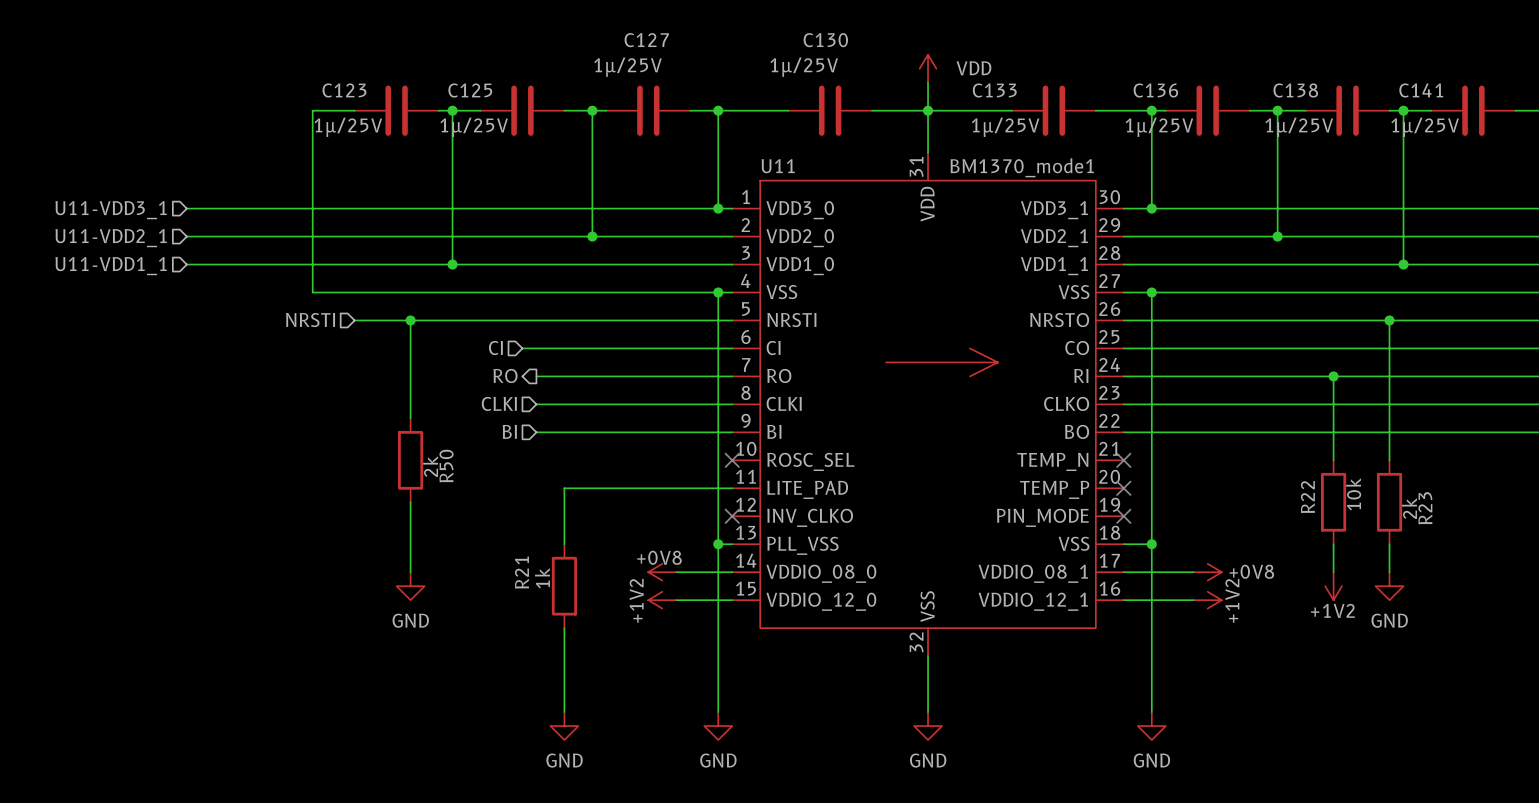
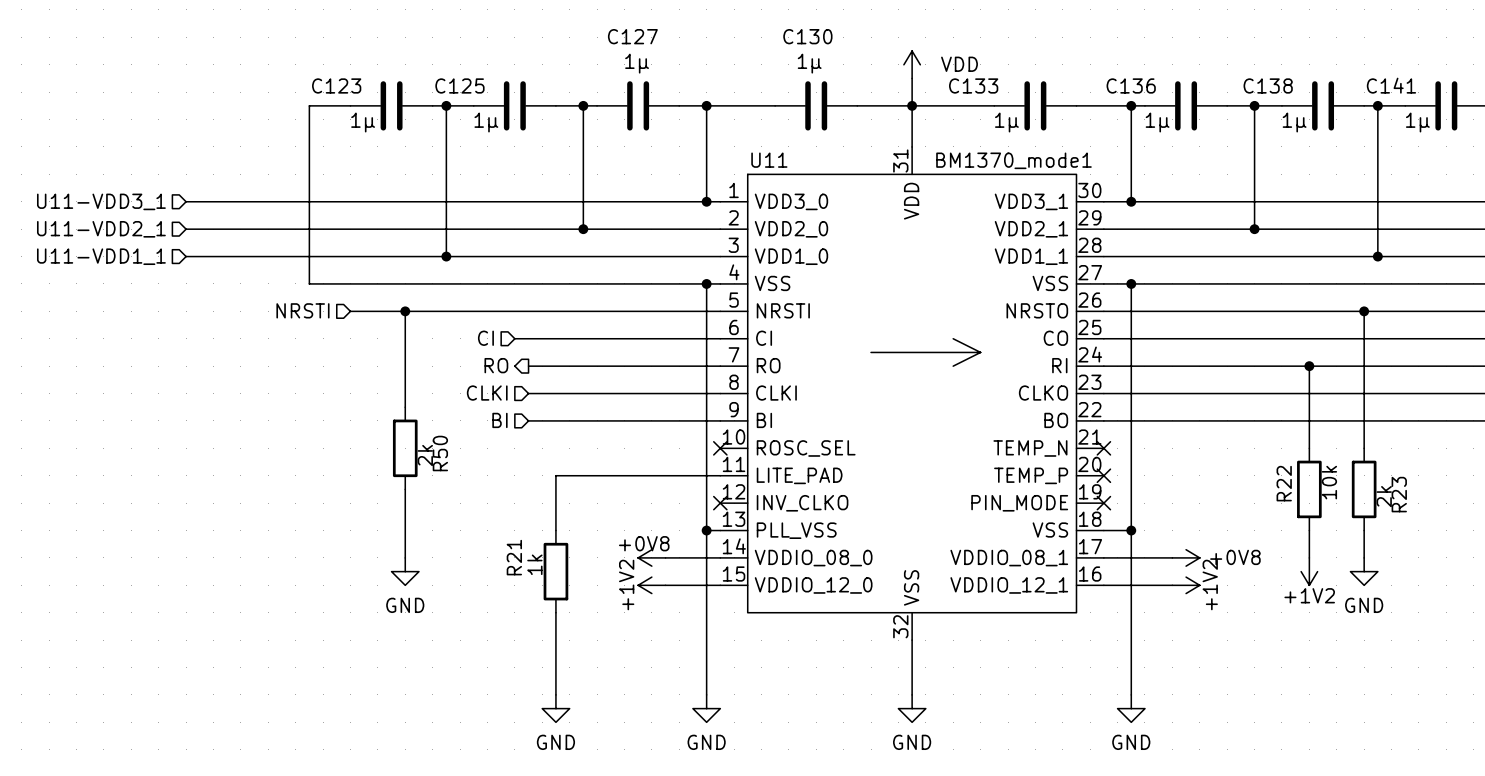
C127 value: 1µ/25V (627, 67) -> 1µ (637, 63)
C130 value: 1µ/25V (804, 67) -> 1µ (809, 63)
C123 value: 1µ/25V (348, 127) -> 1µ (363, 122)
C125 value: 1µ/25V (474, 127) -> 1µ (486, 122)
C133 value: 1µ/25V (1005, 127) -> 1µ (1006, 122)
C136 value: 1µ/25V (1159, 127) -> 1µ (1157, 122)
C138 value: 1µ/25V (1299, 127) -> 1µ (1294, 122)
C141 value: 1µ/25V (1425, 127) -> 1µ (1417, 122)

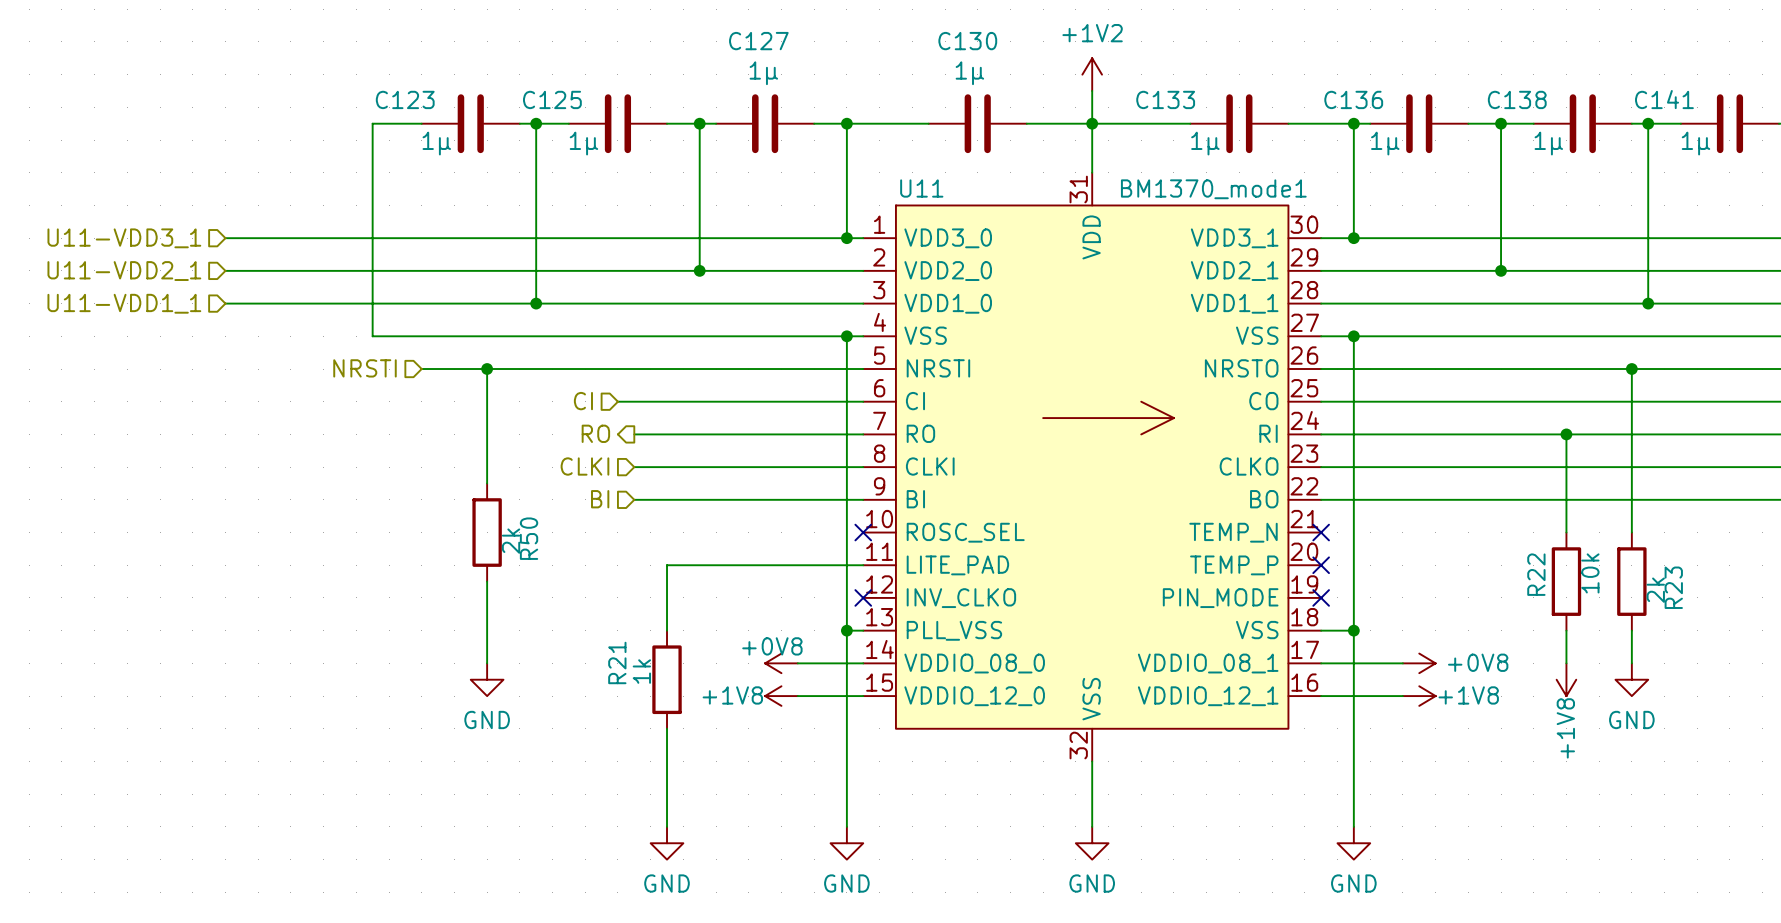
power symbol: VDD (912, 64) -> +1V2 (1092, 74)
power symbol: +1V2 (1309, 571) -> +1V8 (1566, 679)
power symbol: +1V2 (651, 585) -> +1V8 (781, 696)
power symbol: +1V2 (1186, 585) -> +1V8 (1419, 696)

